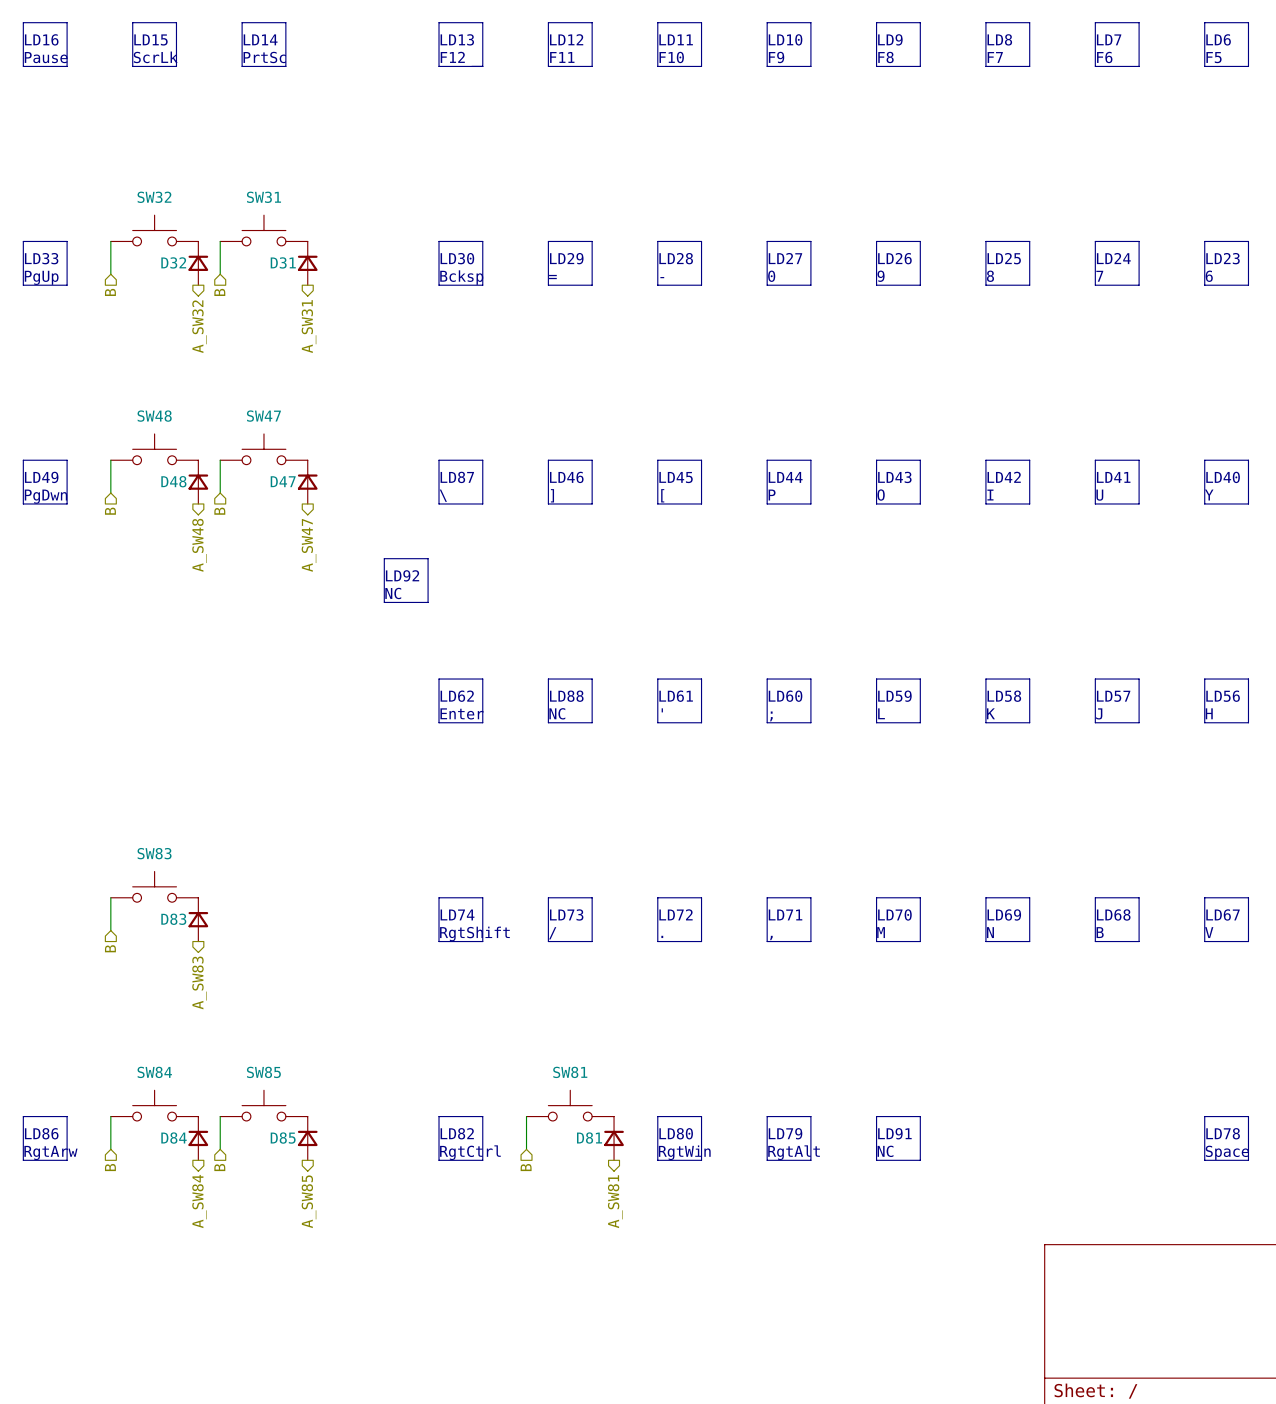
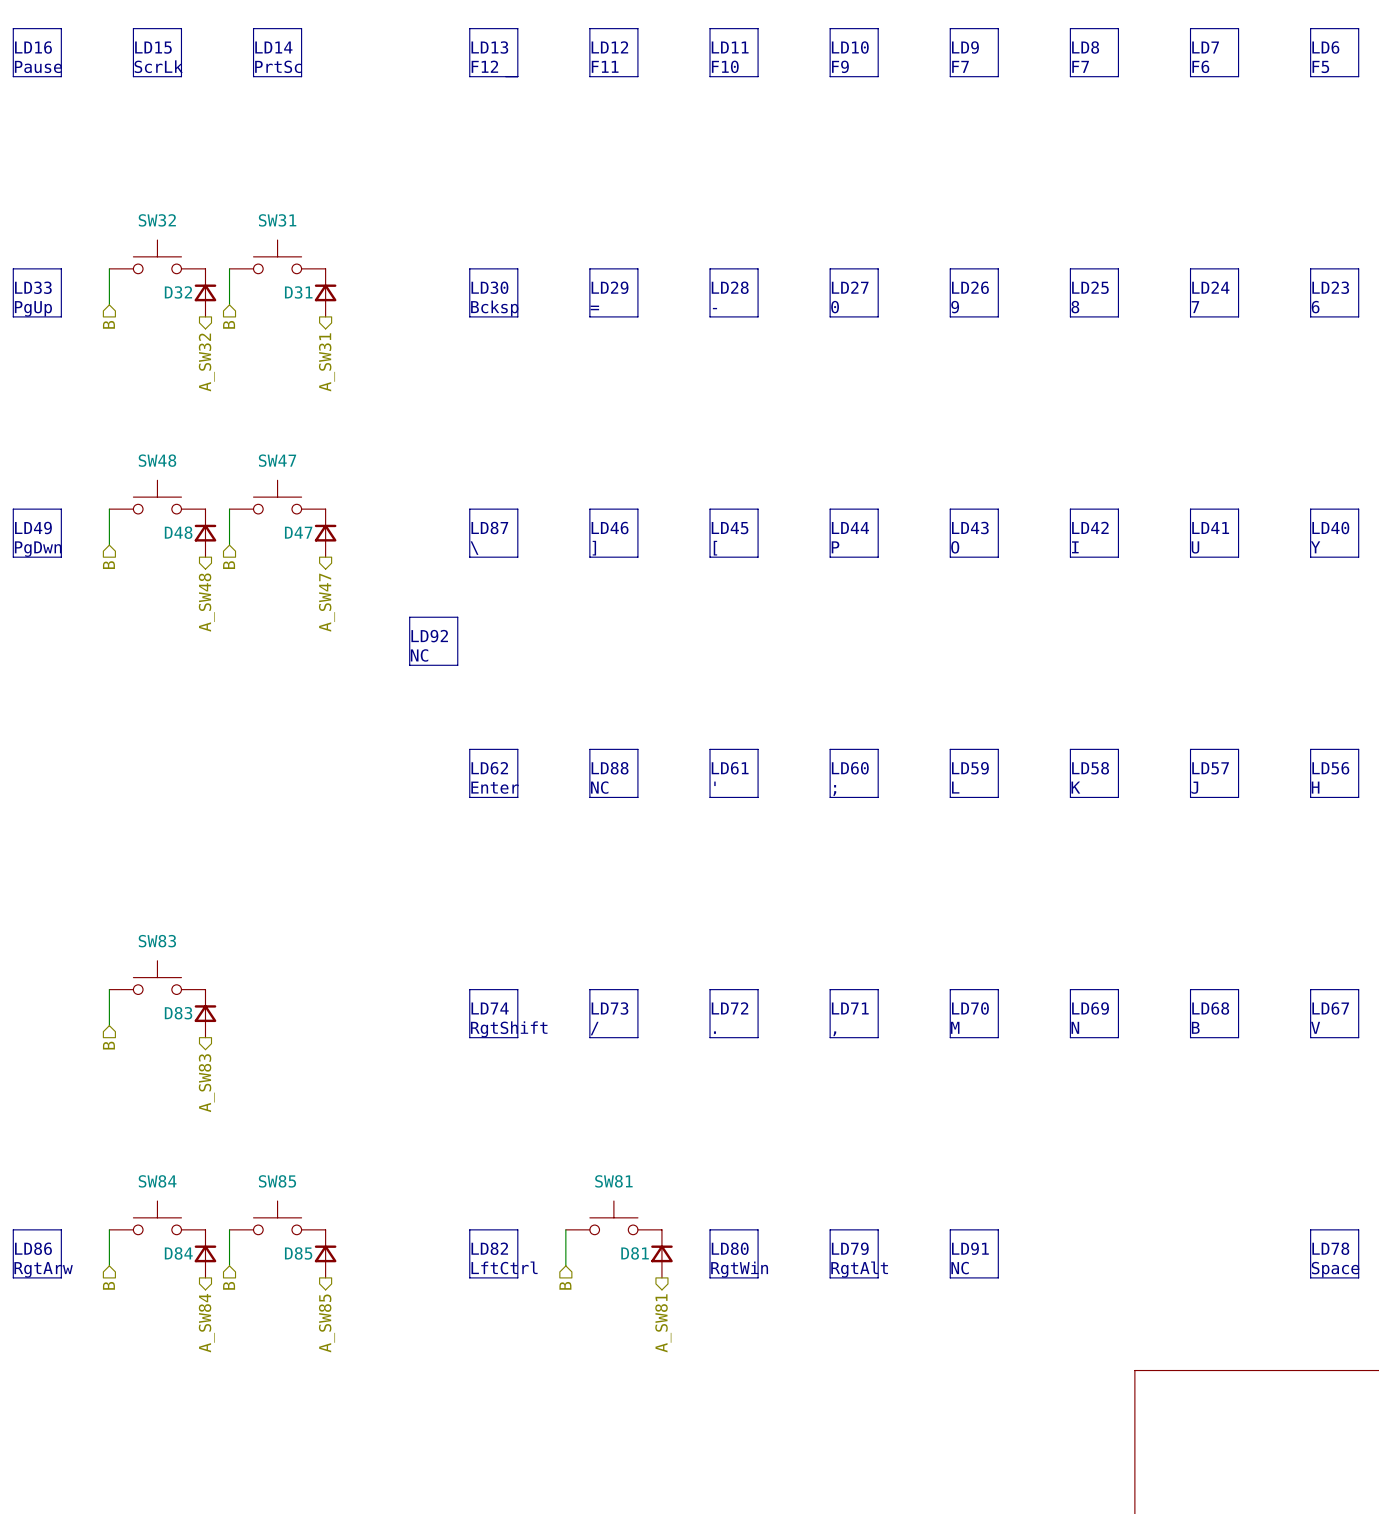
text: F8 (885, 57) -> F7 (960, 66)
text: RgtCtrl (470, 1152) -> LftCtrl (504, 1267)

